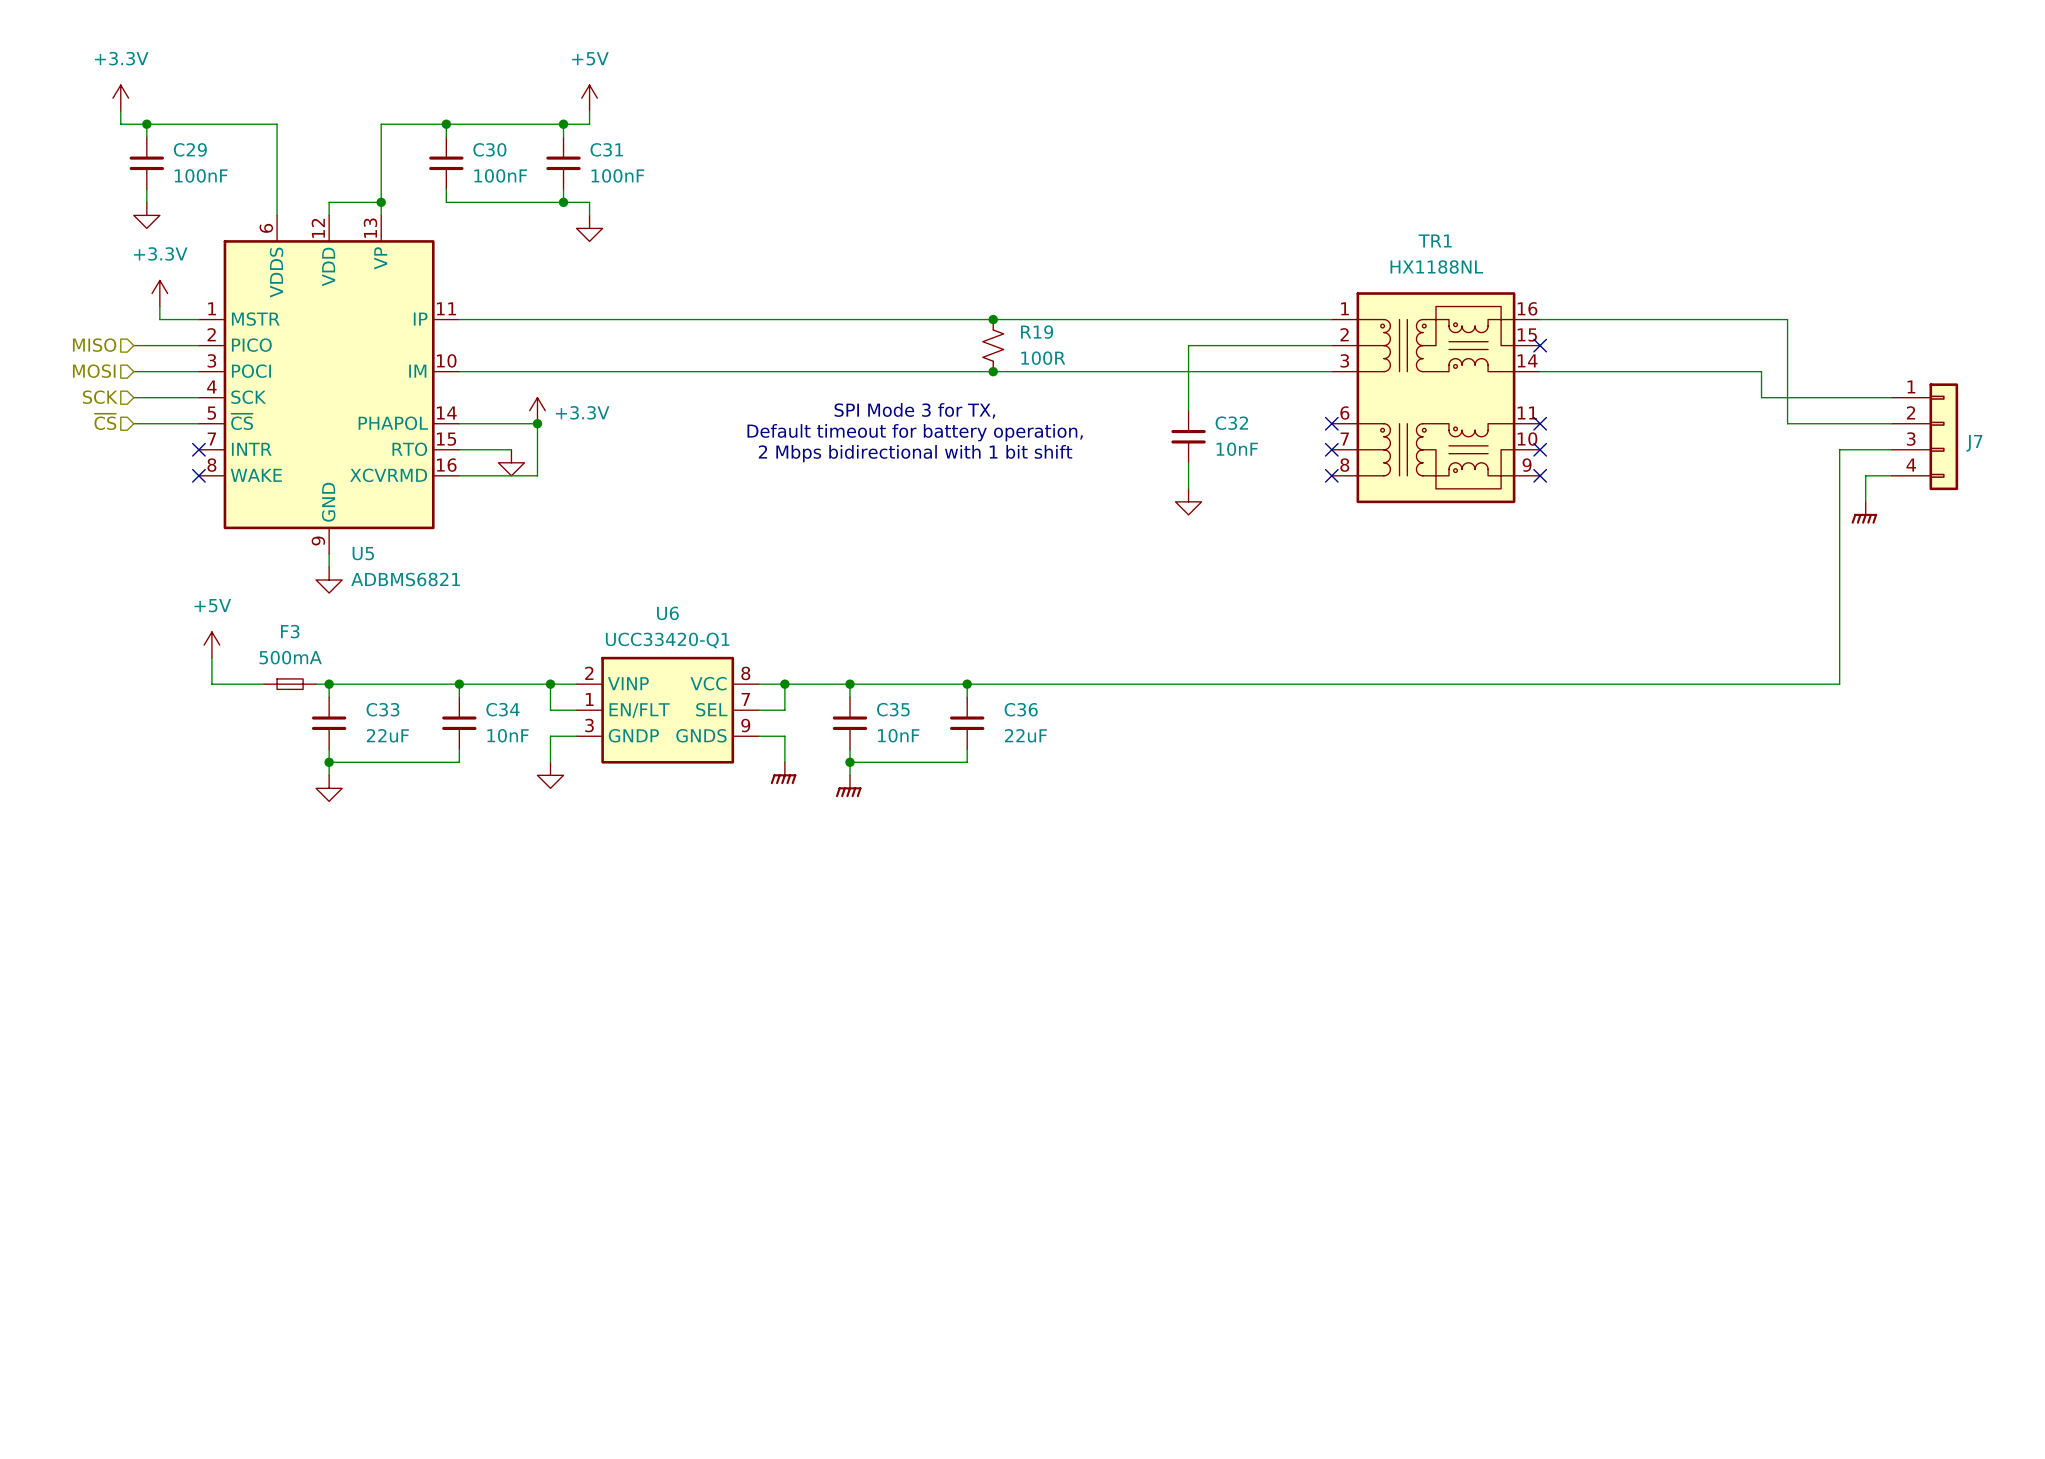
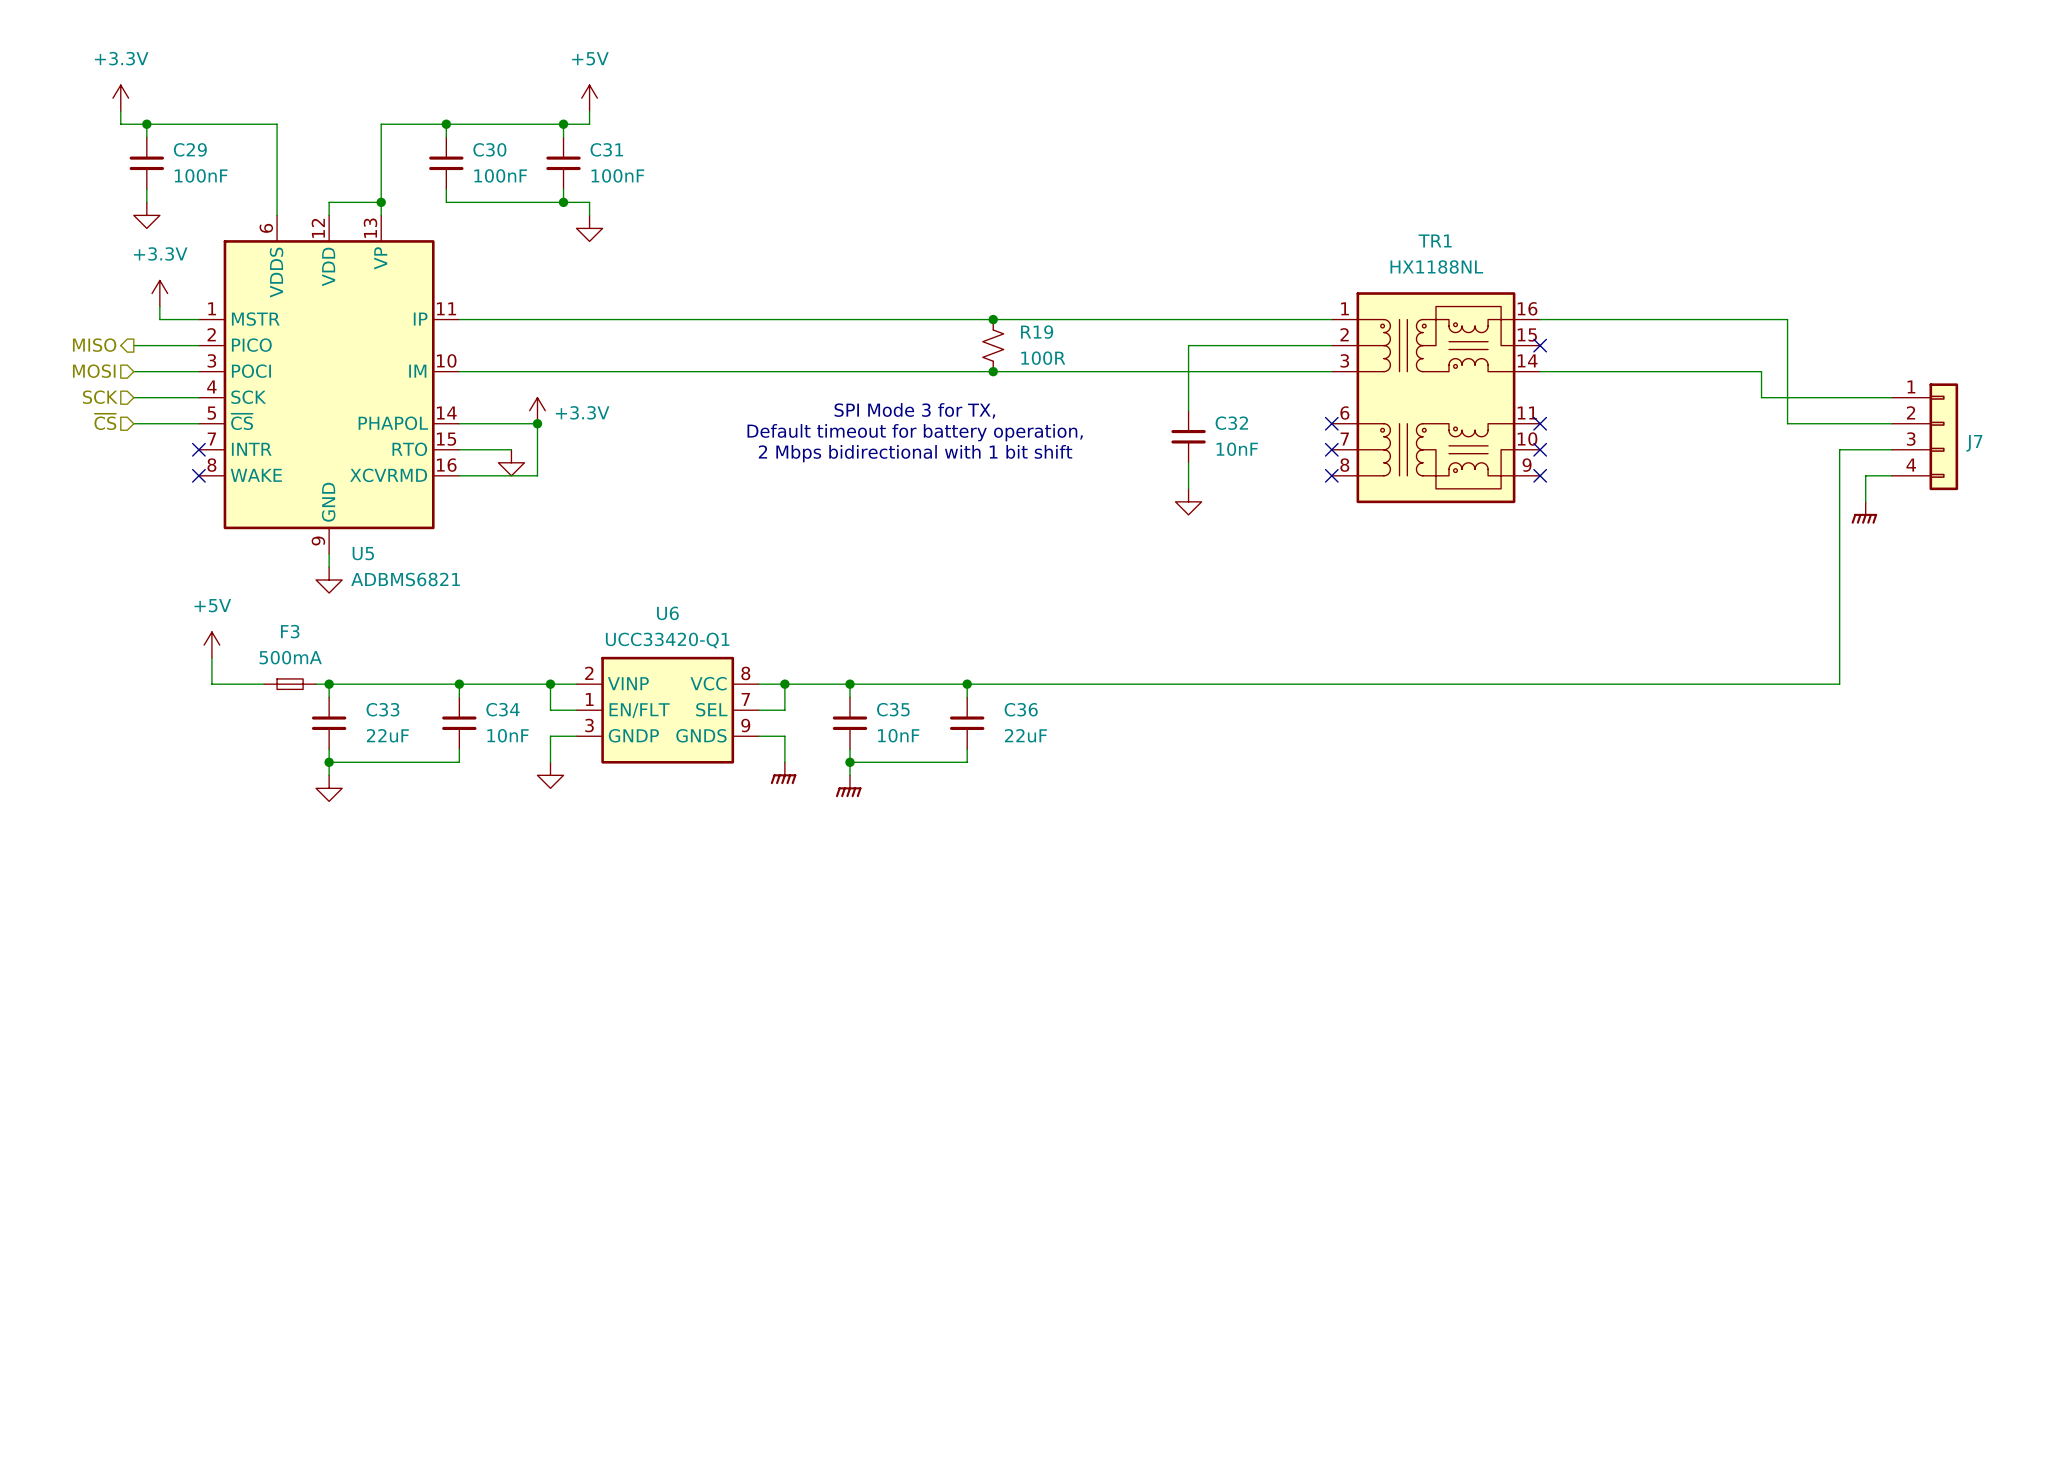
hierarchical label shape: input (94, 345) -> output (94, 345)

